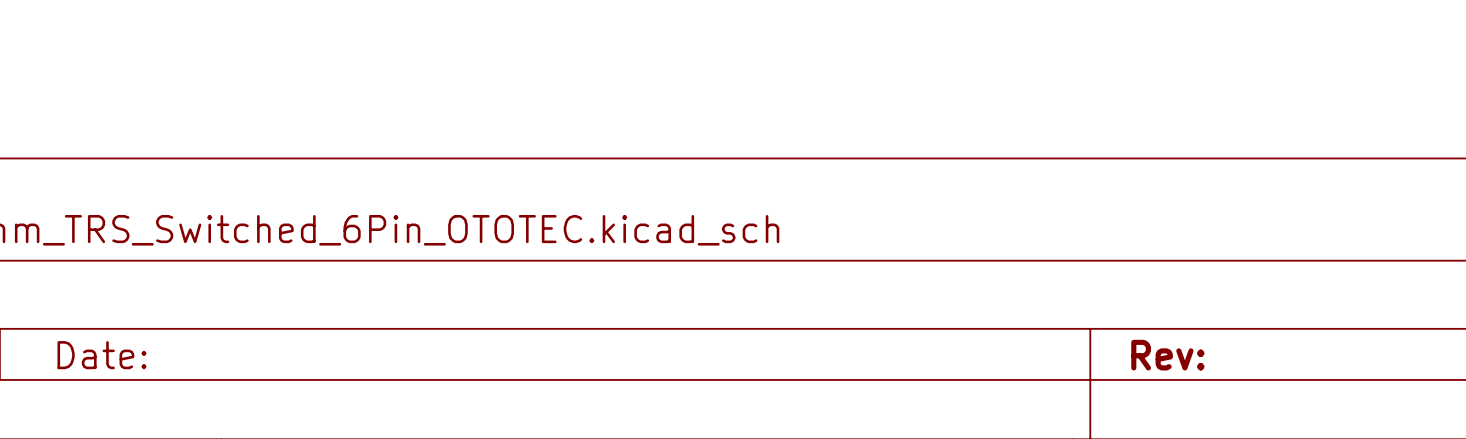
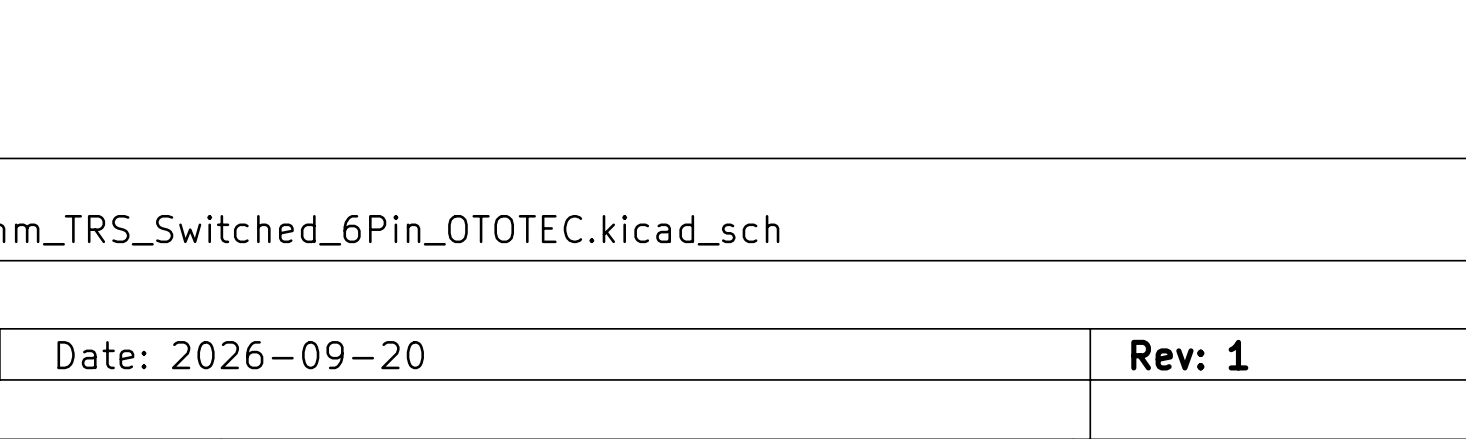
title block: Date: (101, 355) -> Date: 2026-09-20 (240, 355)
title block: Rev: (1167, 355) -> Rev: 1 (1189, 355)

